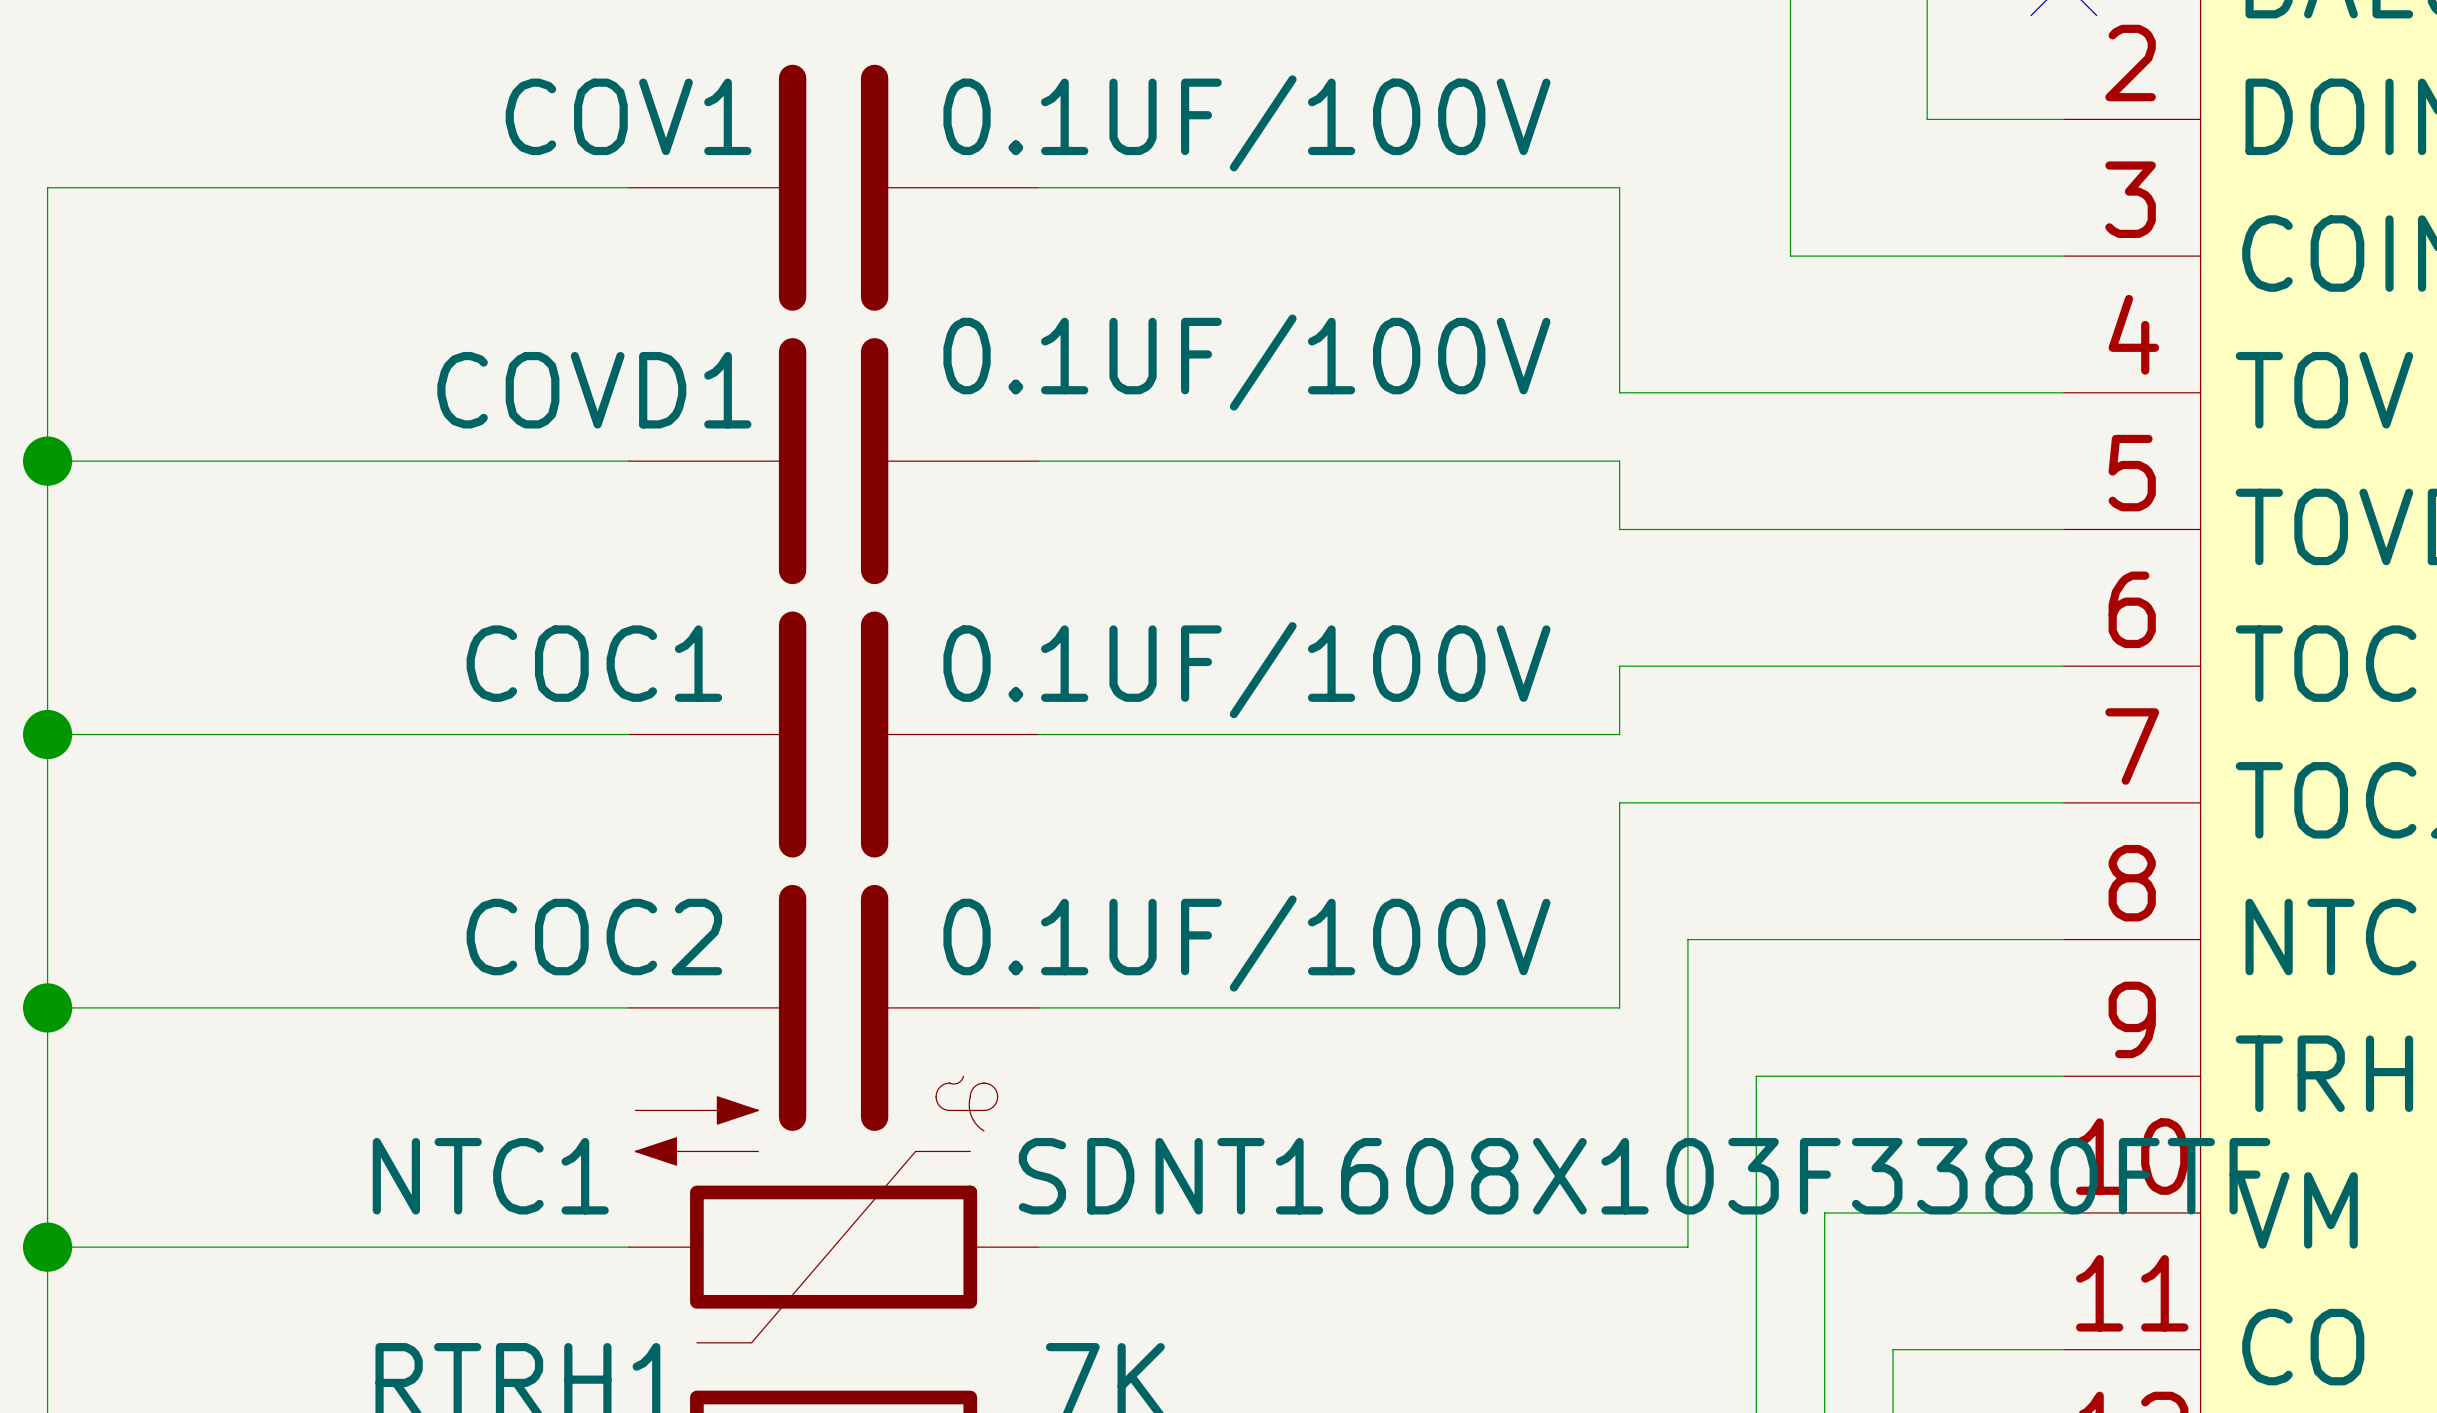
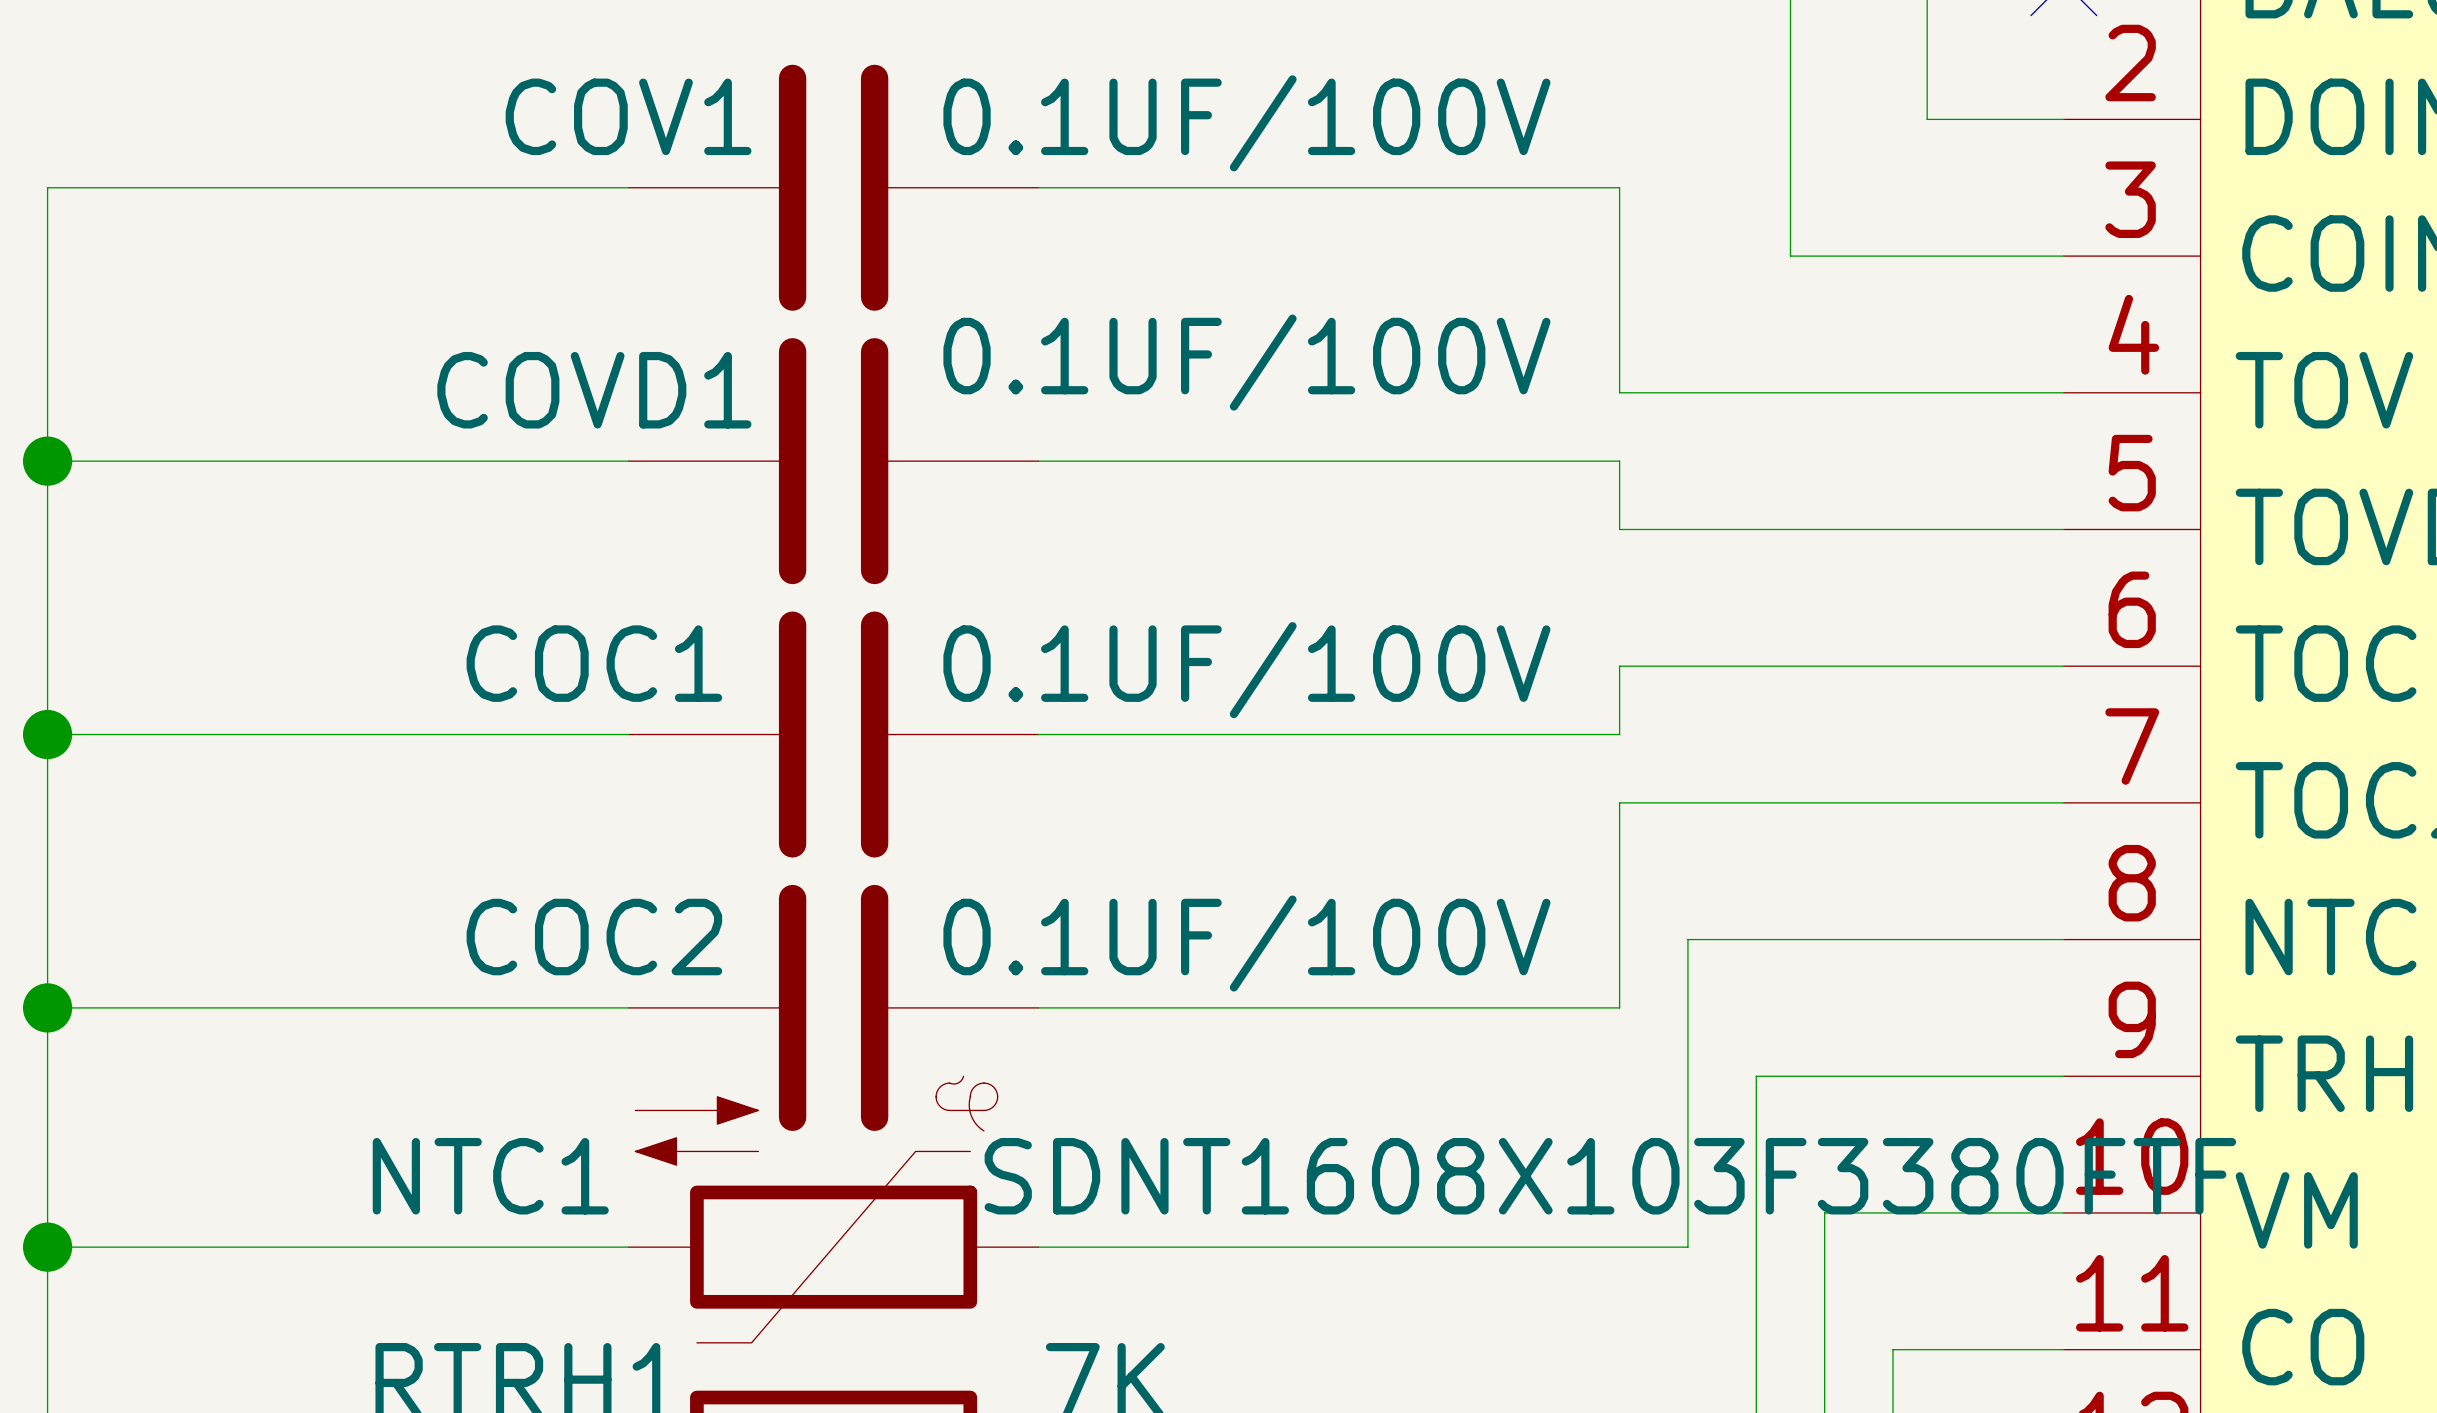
NTC1 value position: SDNT1608X103F3380FTF (1644, 1176) -> SDNT1608X103F3380FTF (1610, 1176)

